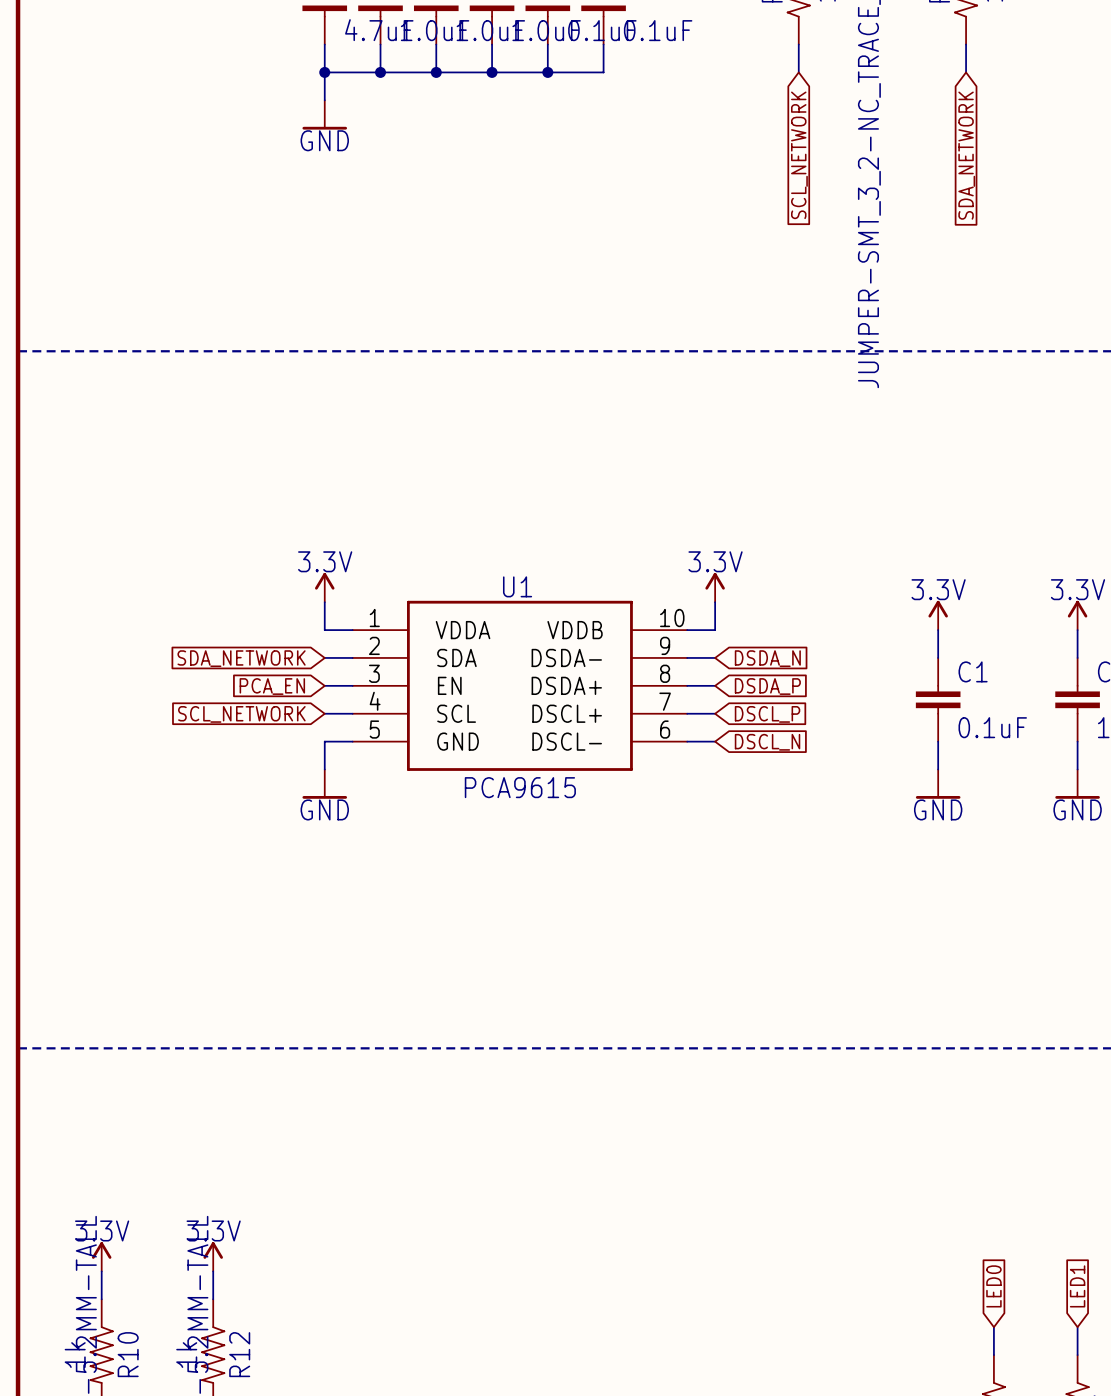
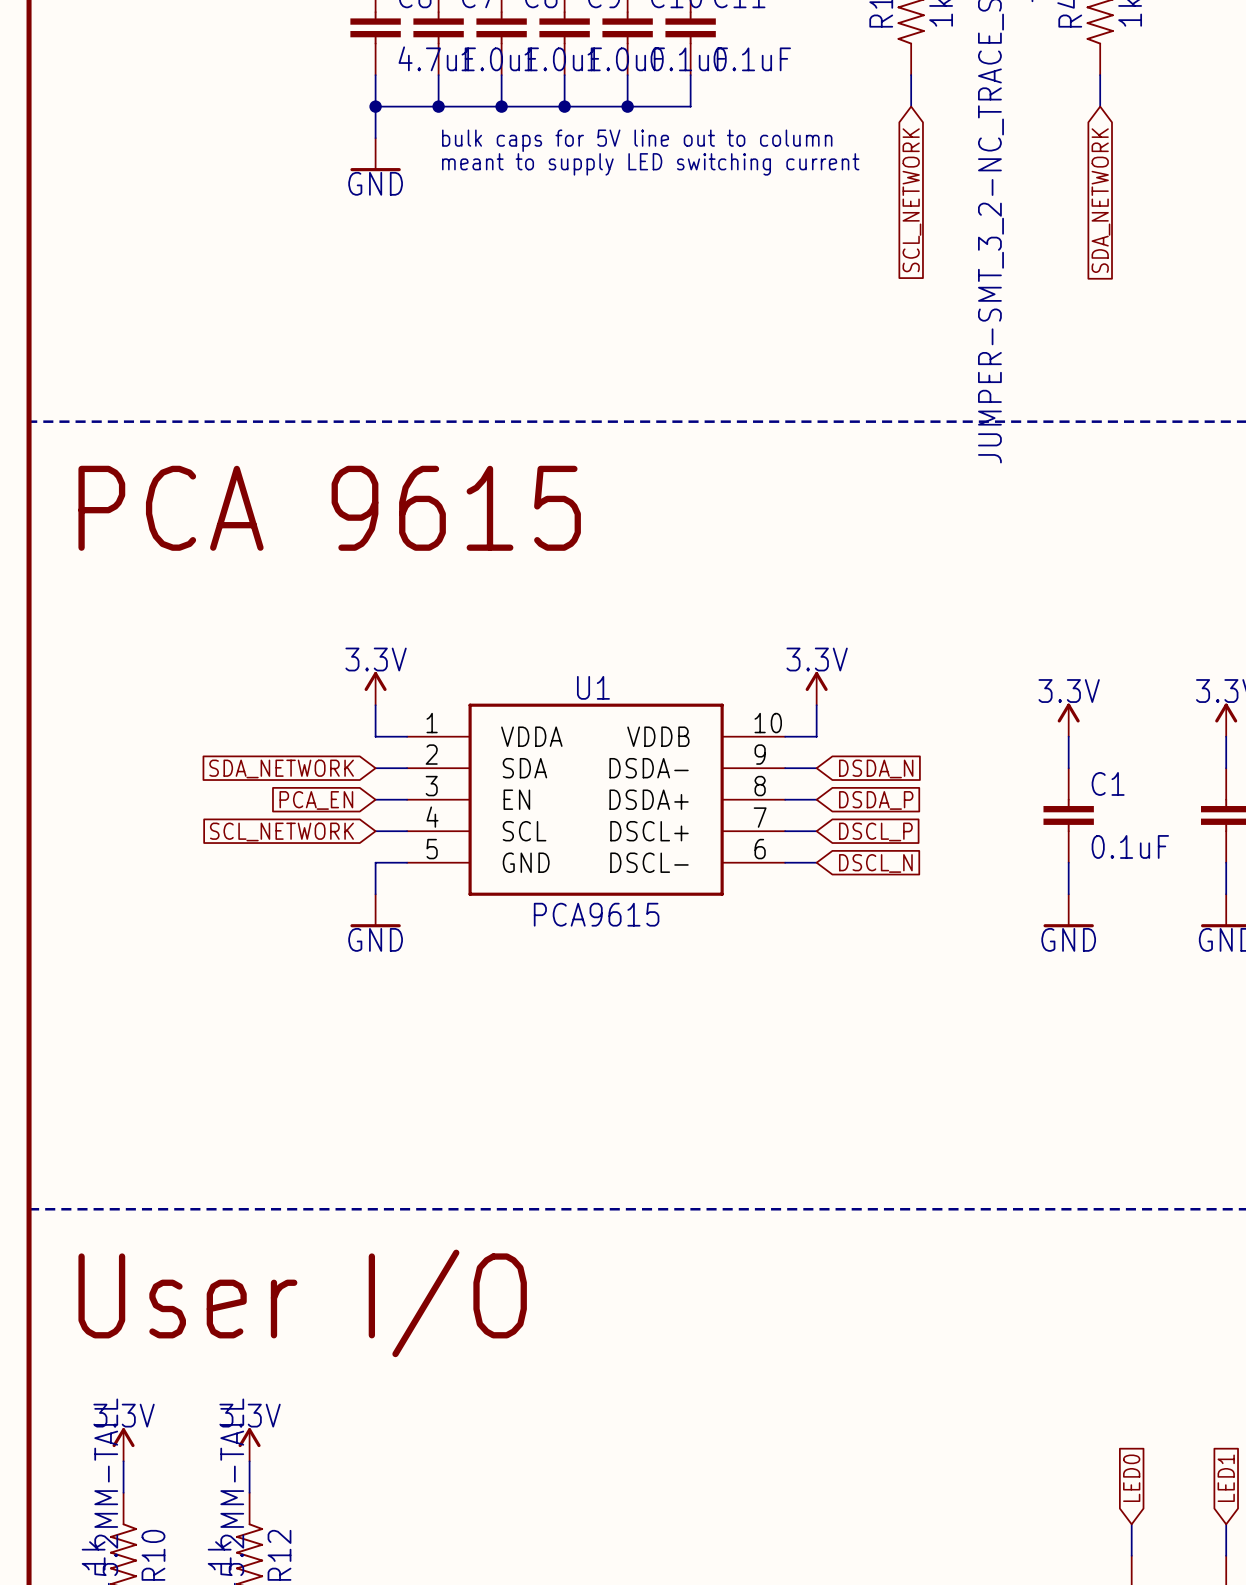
text: none -> bulk caps for 5V line out to column (637, 140)
text: none -> meant to supply LED switching current (650, 164)
text: none -> PCA 9615 (329, 508)
text: none -> User I/O (302, 1303)

